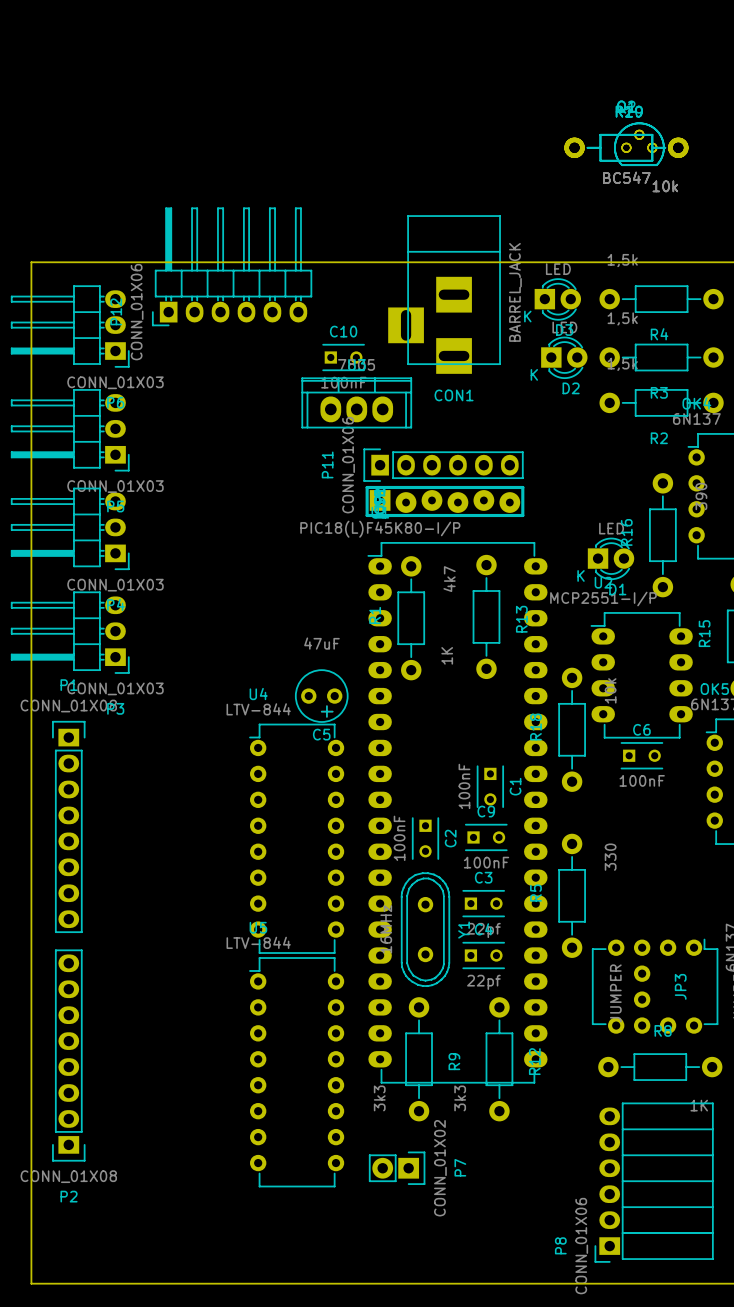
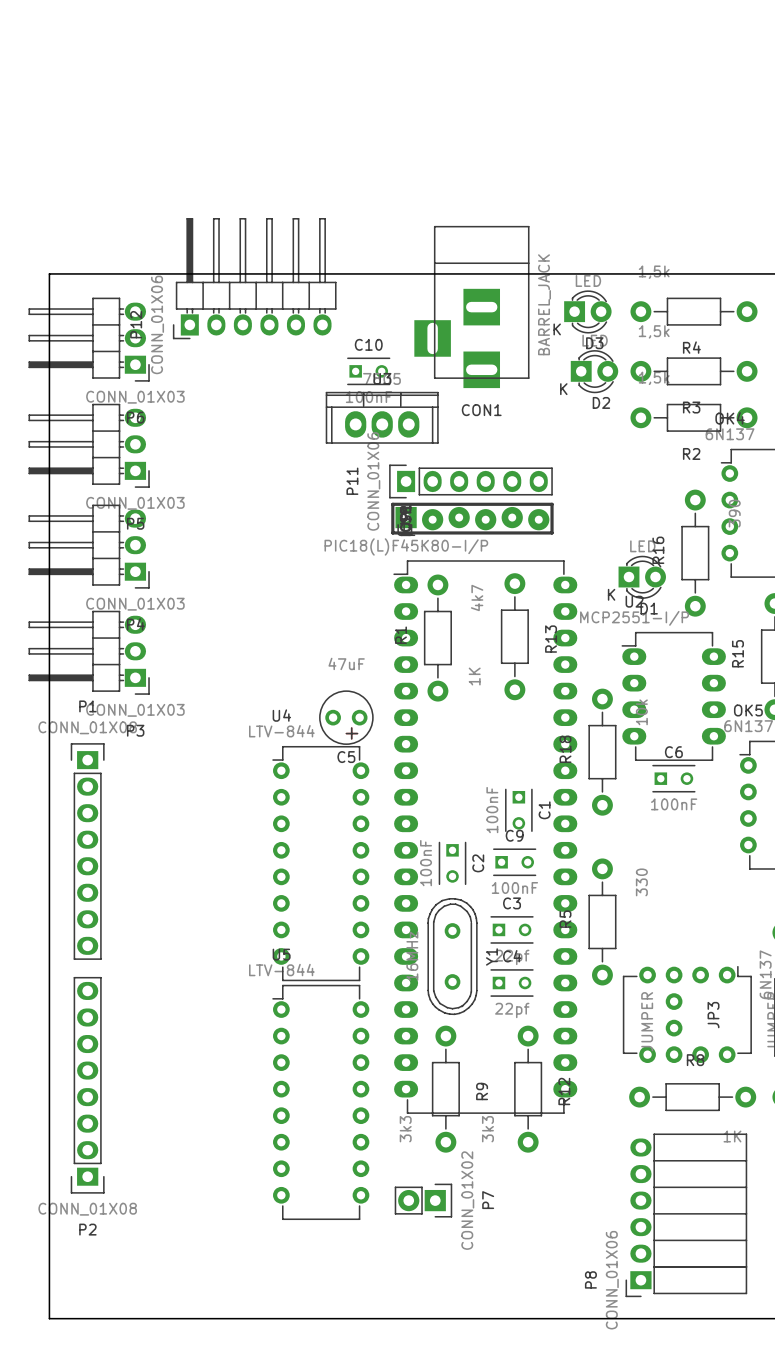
part: BC547 (639, 144) -> none
part: BC547 (639, 144) -> none
part: 10k (626, 147) -> none
part: 10k (626, 147) -> none

